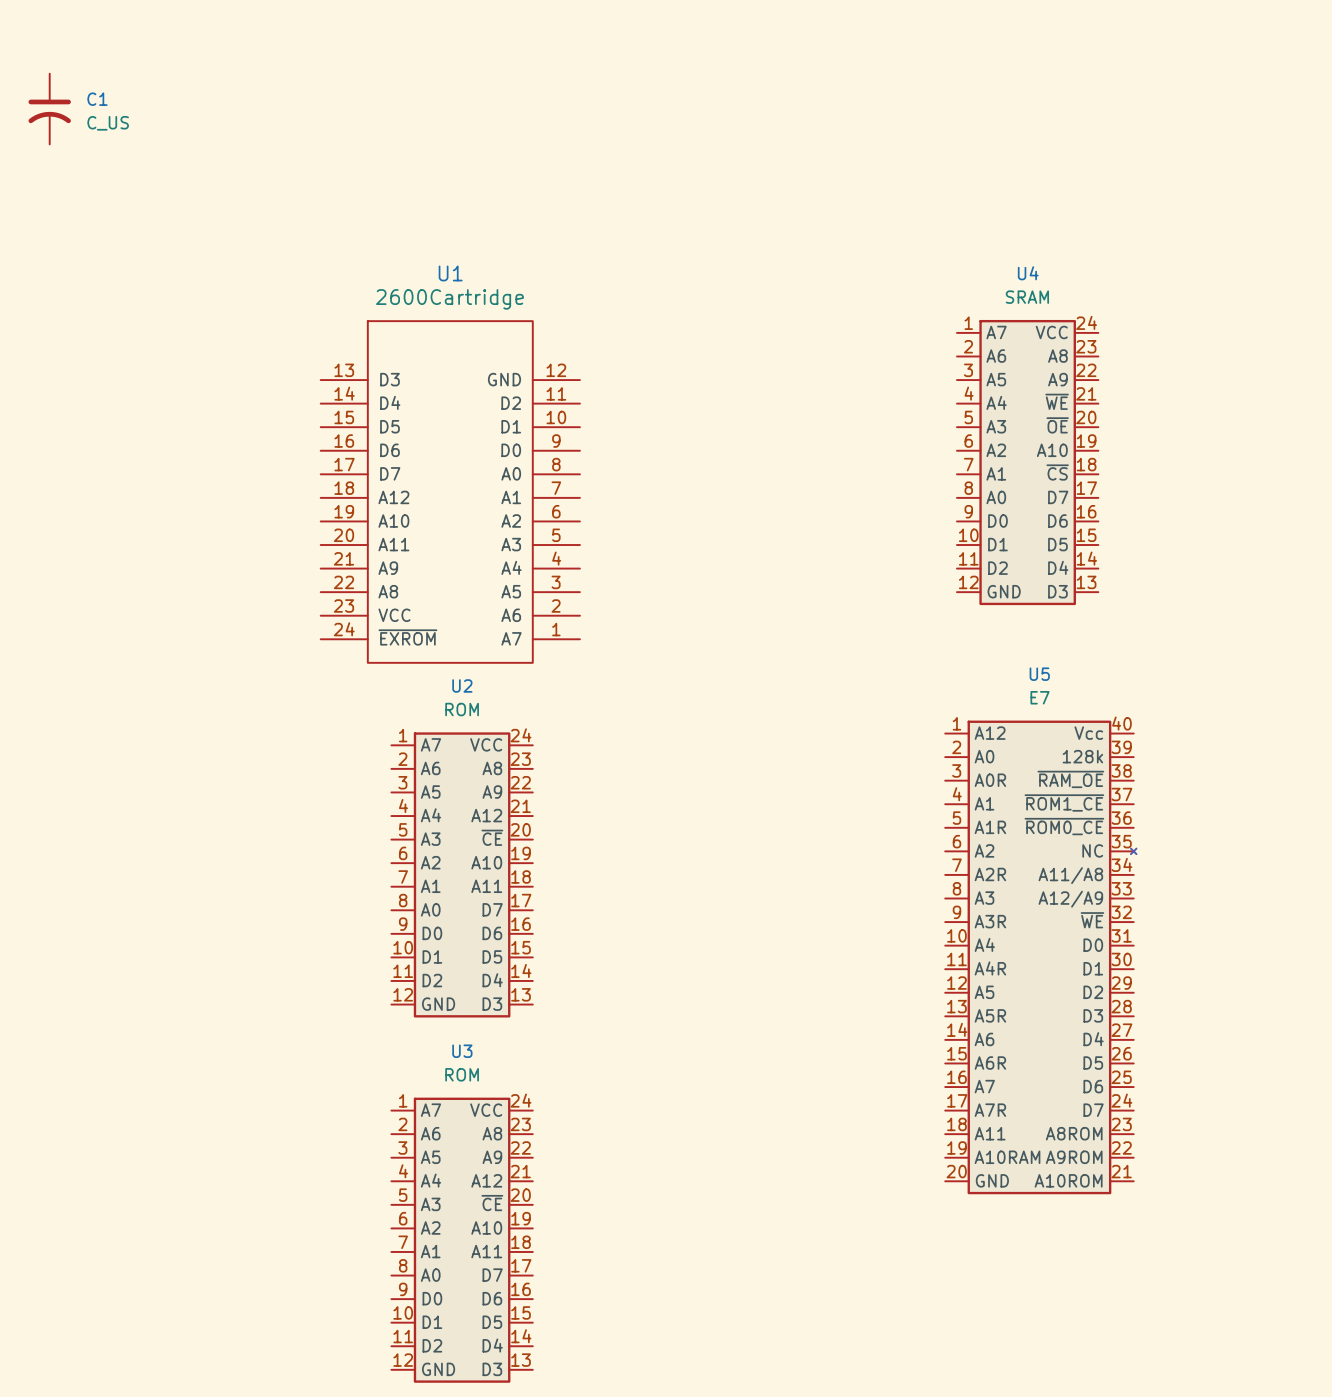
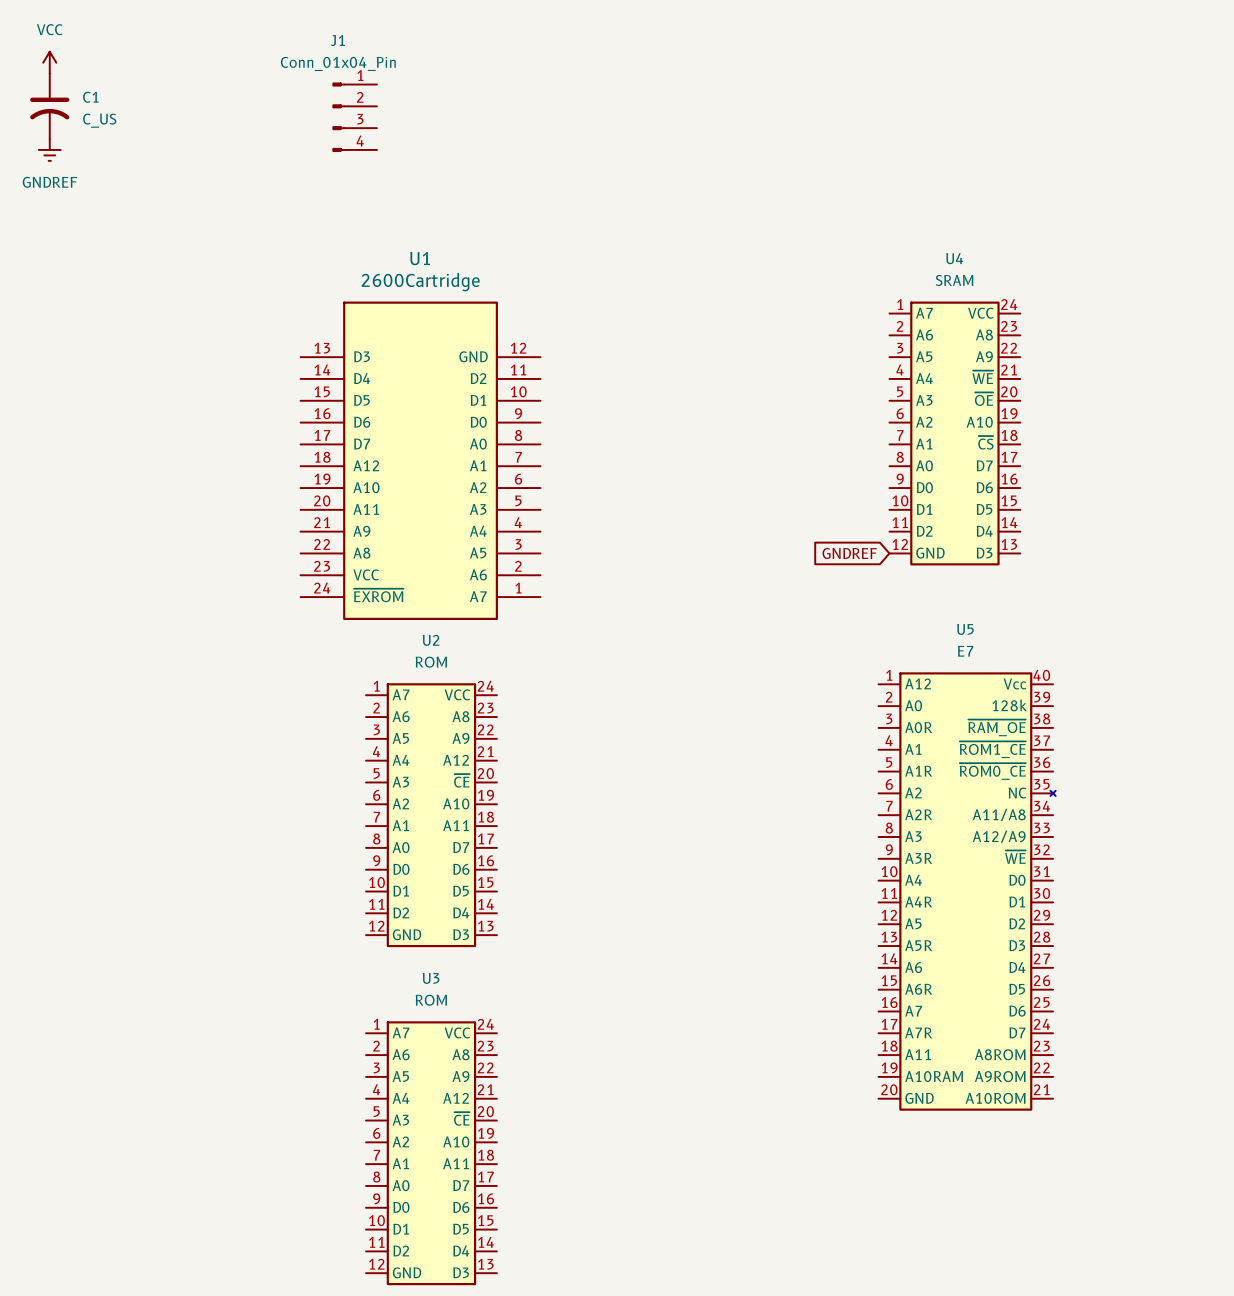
power symbol: none -> VCC (49, 62)
J1: none -> Conn_01x04_Pin (354, 117)
power symbol: none -> GNDREF (49, 149)
U1 symbol: [320, 321, 580, 663] -> [300, 301, 541, 620]
global label: none -> GNDREF (849, 553)

